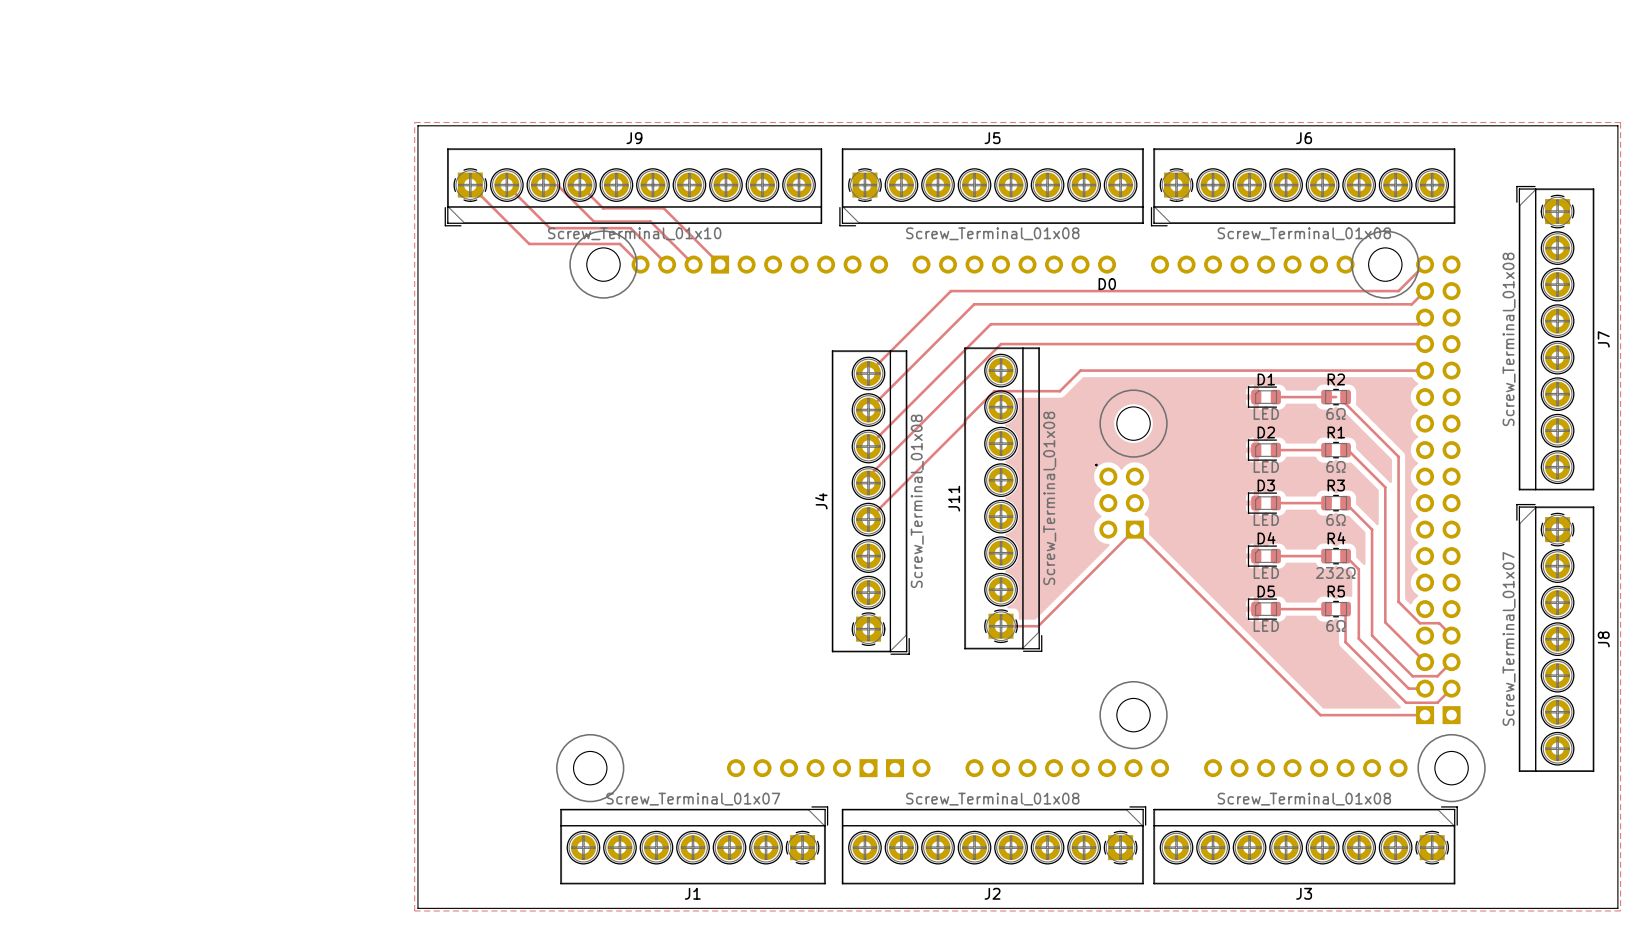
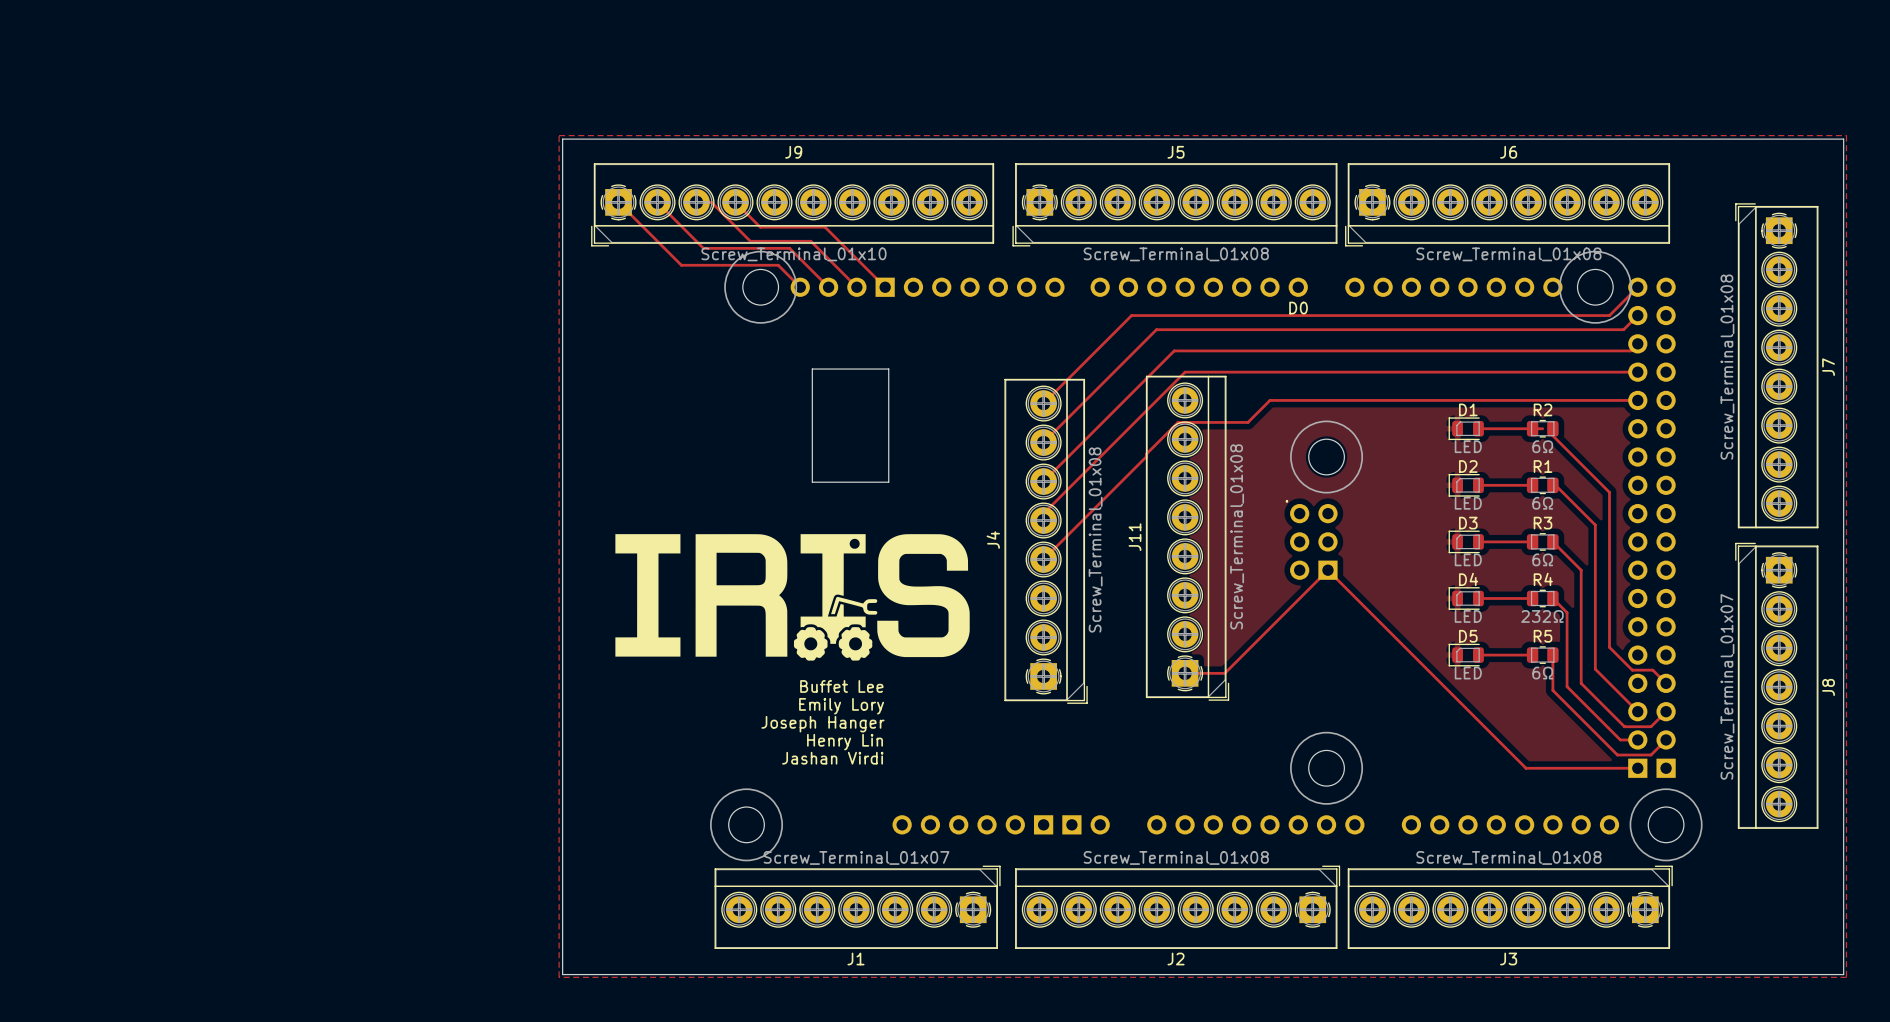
board edge: none -> (812, 369) (888, 369) (888, 482) (812, 482) (812, 369)
drawing: none -> [615, 534, 970, 661]
text: none -> Buffet Lee (841, 686)
text: none -> Emily Lory (841, 706)
text: none -> Joseph Hanger (823, 724)
text: none -> Henry Lin (845, 742)
text: none -> Jashan Virdi (832, 758)

